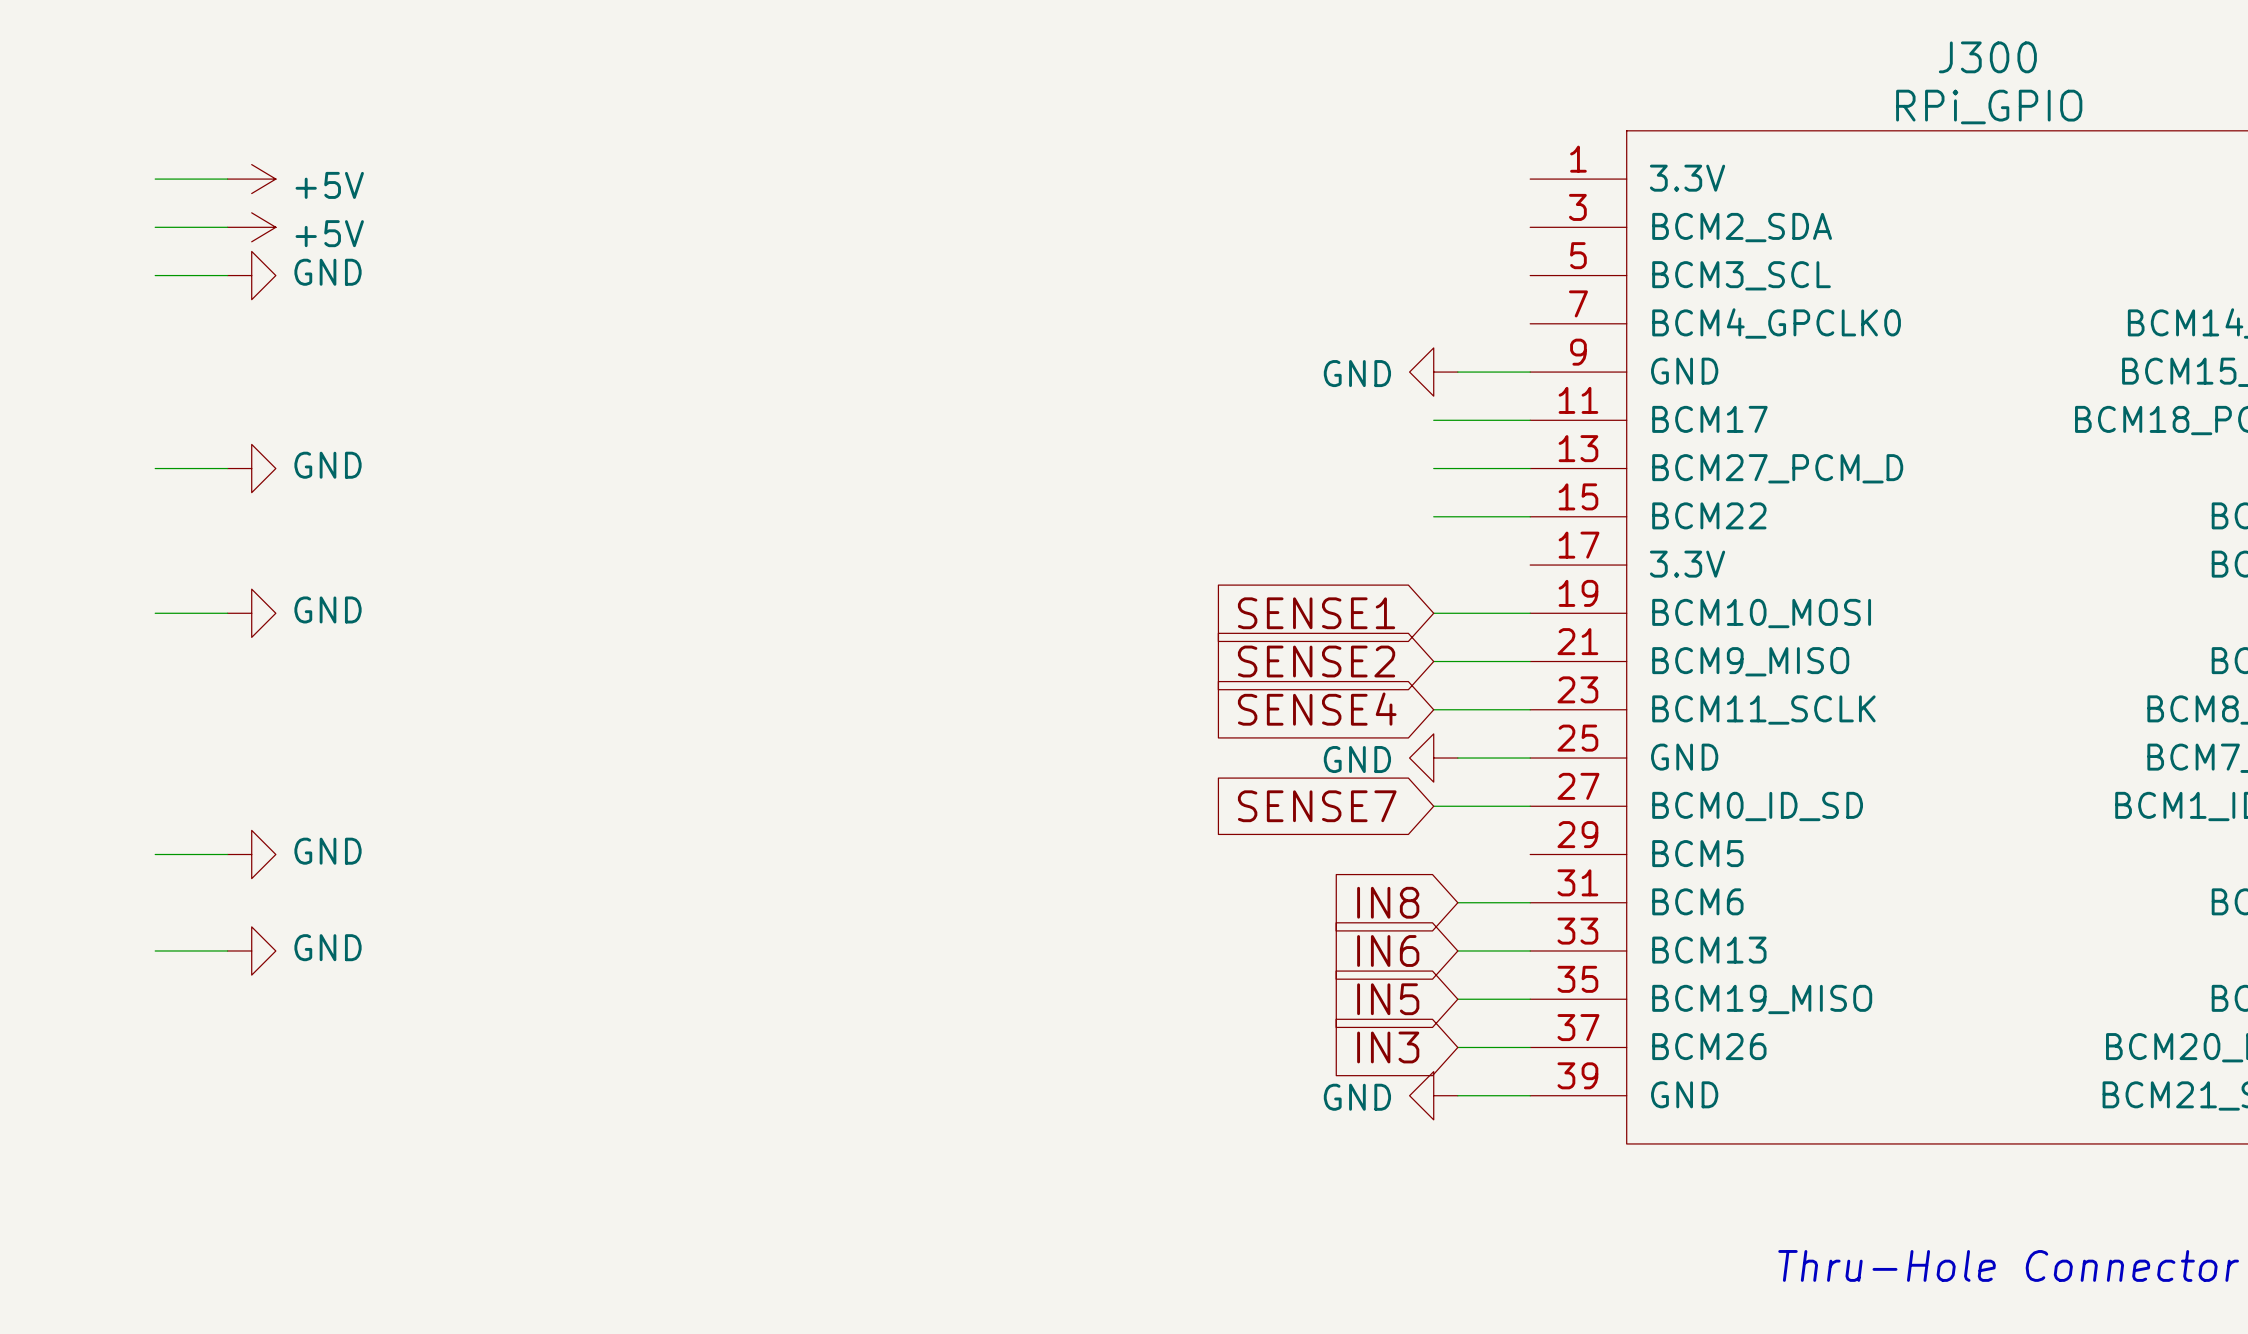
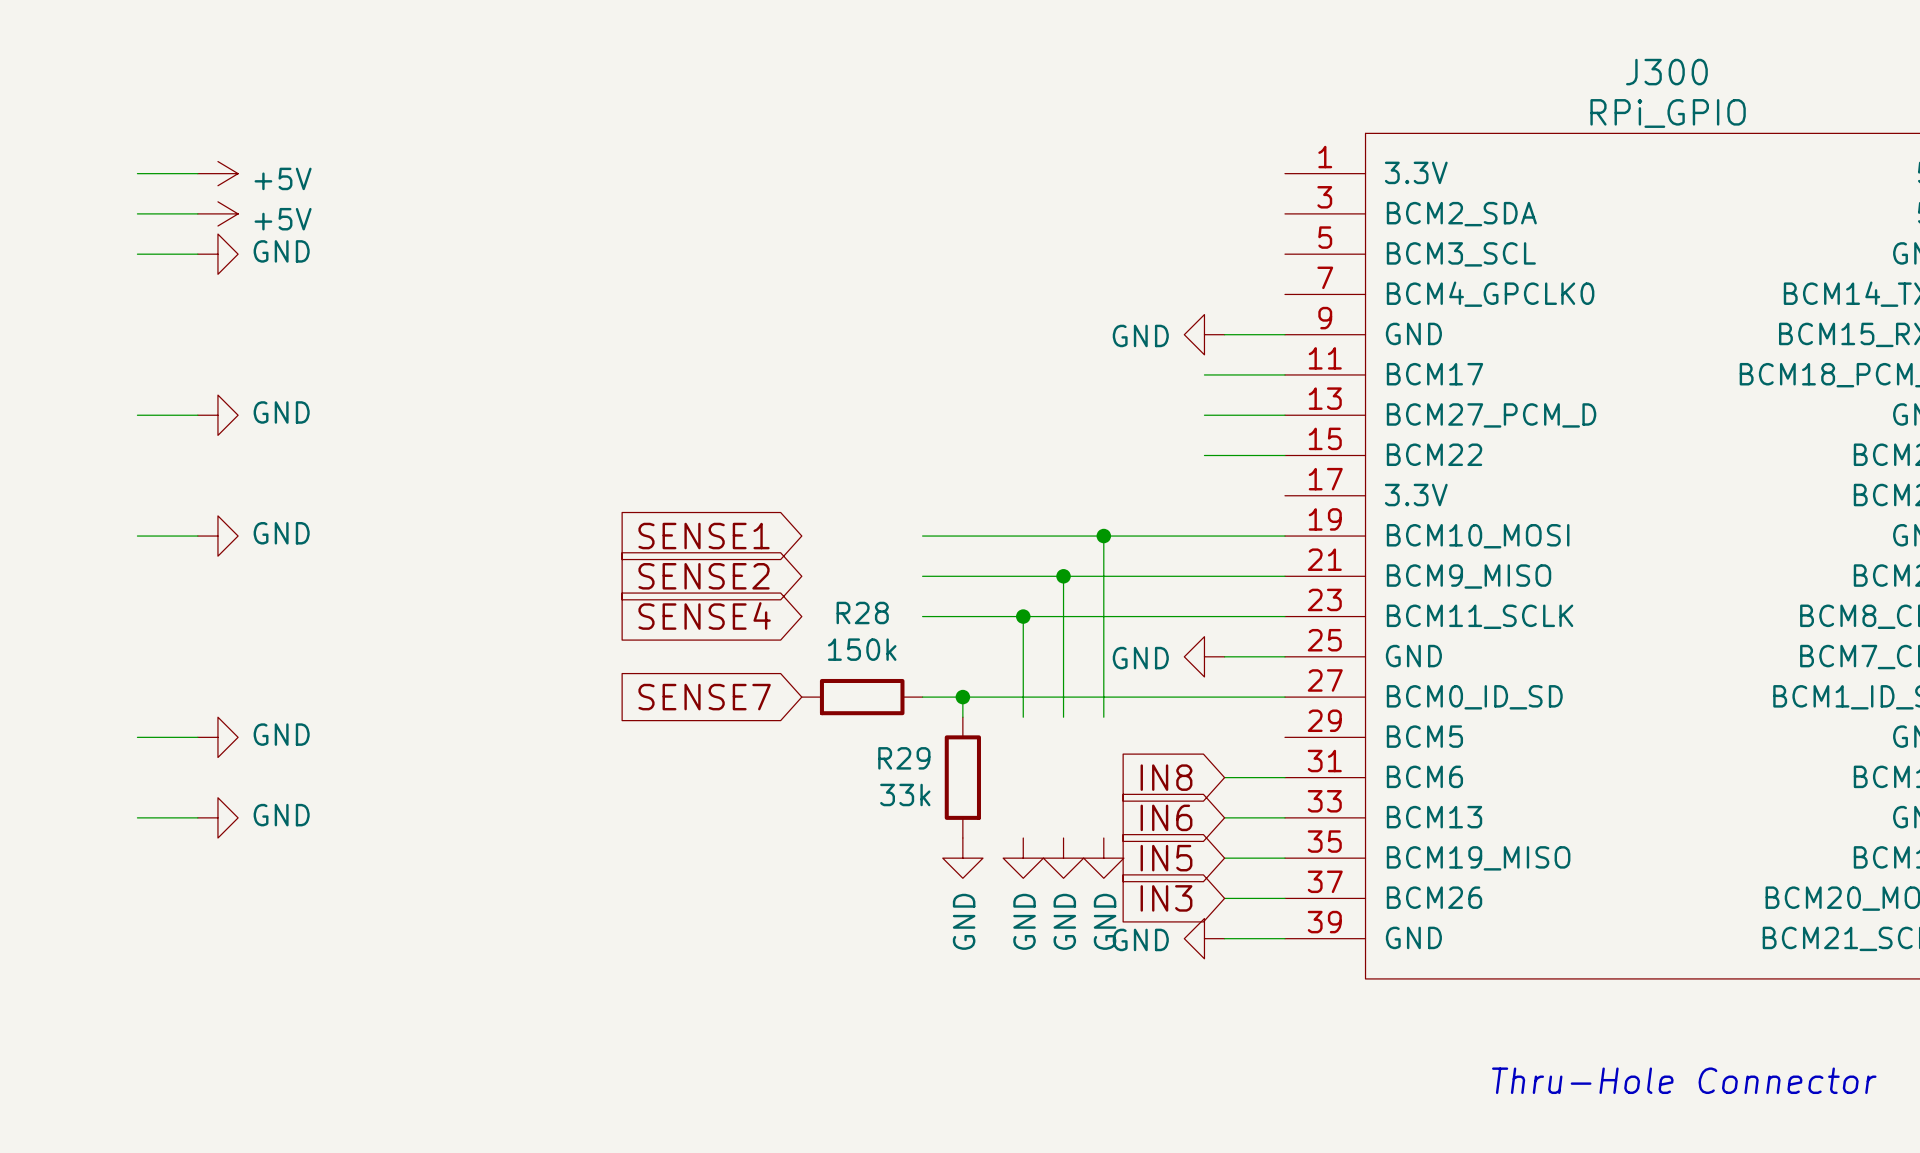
global label: none -> SENSE1 (704, 536)
wire: none -> (922, 536) (1204, 536)
wire: none -> (1103, 536) (1103, 717)
junction: none -> (1103, 536)
global label: SENSE1 (1316, 613) -> none
global label: none -> SENSE2 (704, 576)
wire: none -> (922, 576) (1204, 576)
wire: none -> (1063, 576) (1063, 717)
junction: none -> (1063, 576)
global label: SENSE2 (1316, 661) -> none
global label: none -> SENSE4 (704, 615)
wire: none -> (922, 616) (1204, 616)
wire: none -> (1023, 616) (1023, 717)
junction: none -> (1023, 616)
global label: SENSE4 (1317, 709) -> none
global label: none -> SENSE7 (704, 697)
R28: none -> 150k (862, 697)
wire: none -> (922, 697) (1204, 697)
wire: none -> (962, 697) (962, 717)
junction: none -> (962, 697)
global label: SENSE7 (1317, 806) -> none
R29: none -> 33k (962, 777)
power symbol: none -> GND (962, 858)
power symbol: none -> GND (1023, 858)
power symbol: none -> GND (1063, 858)
power symbol: none -> GND (1103, 858)

